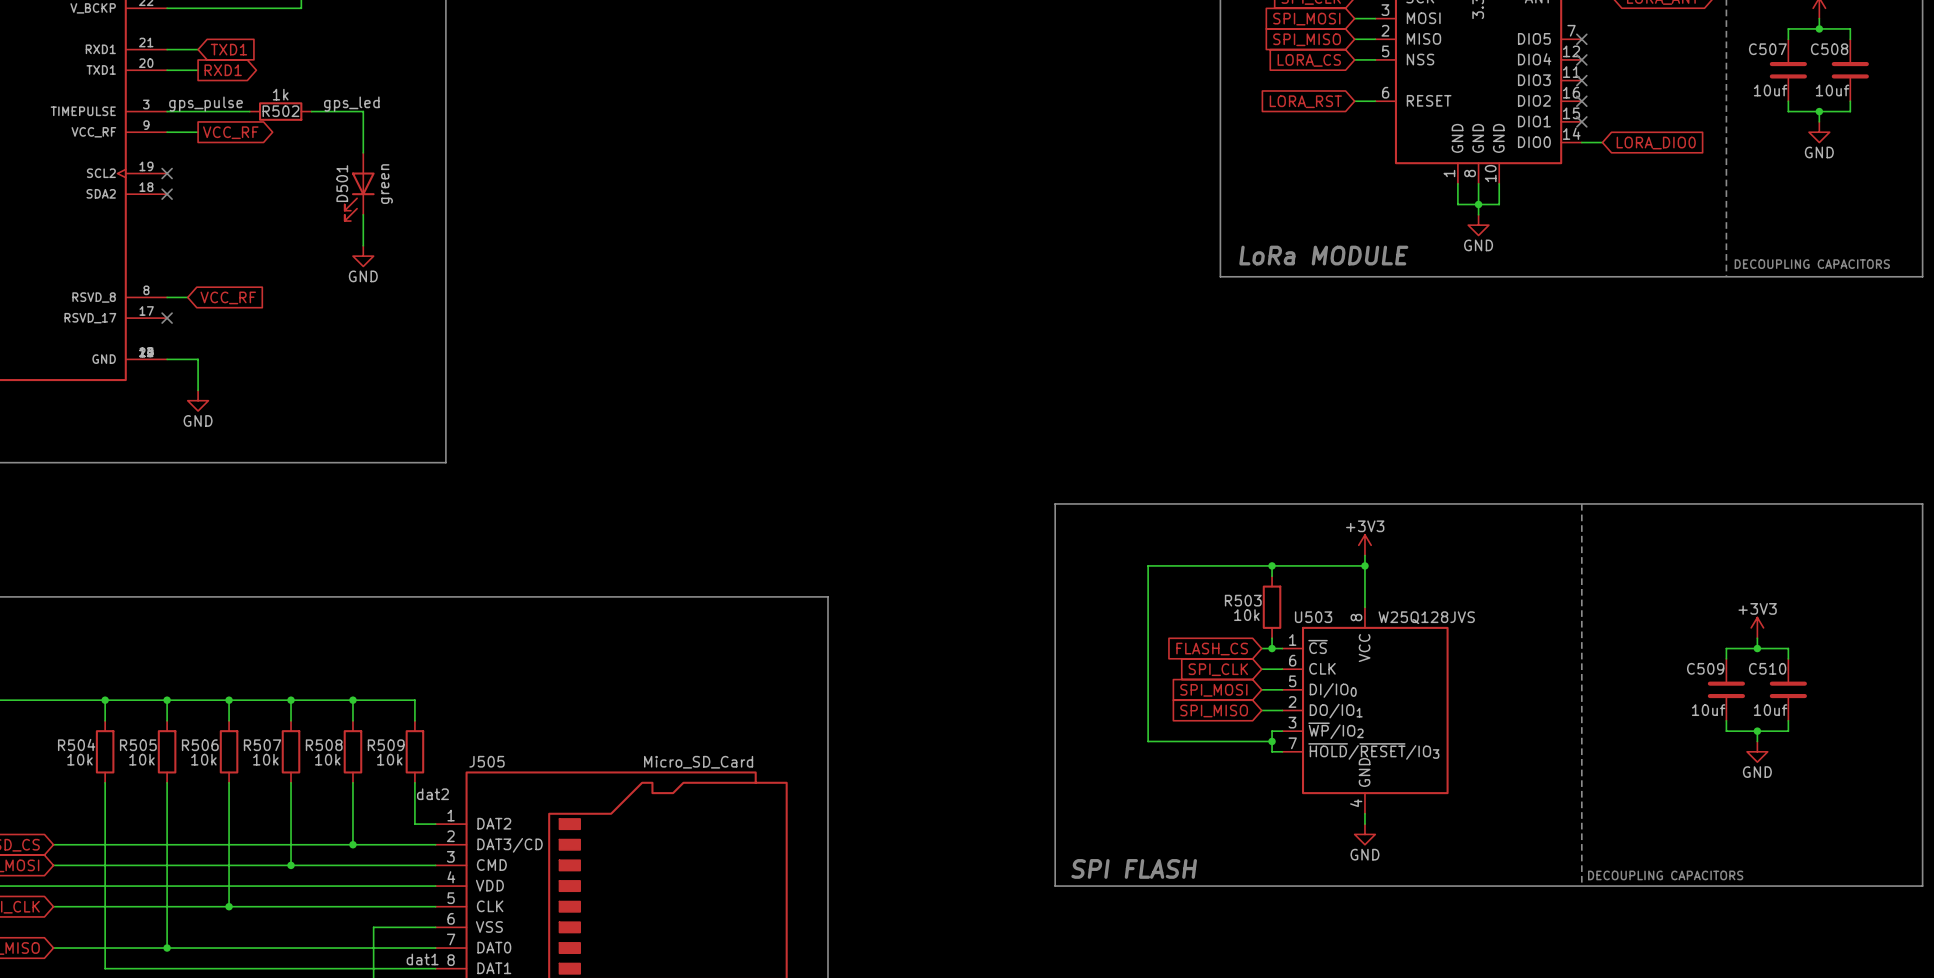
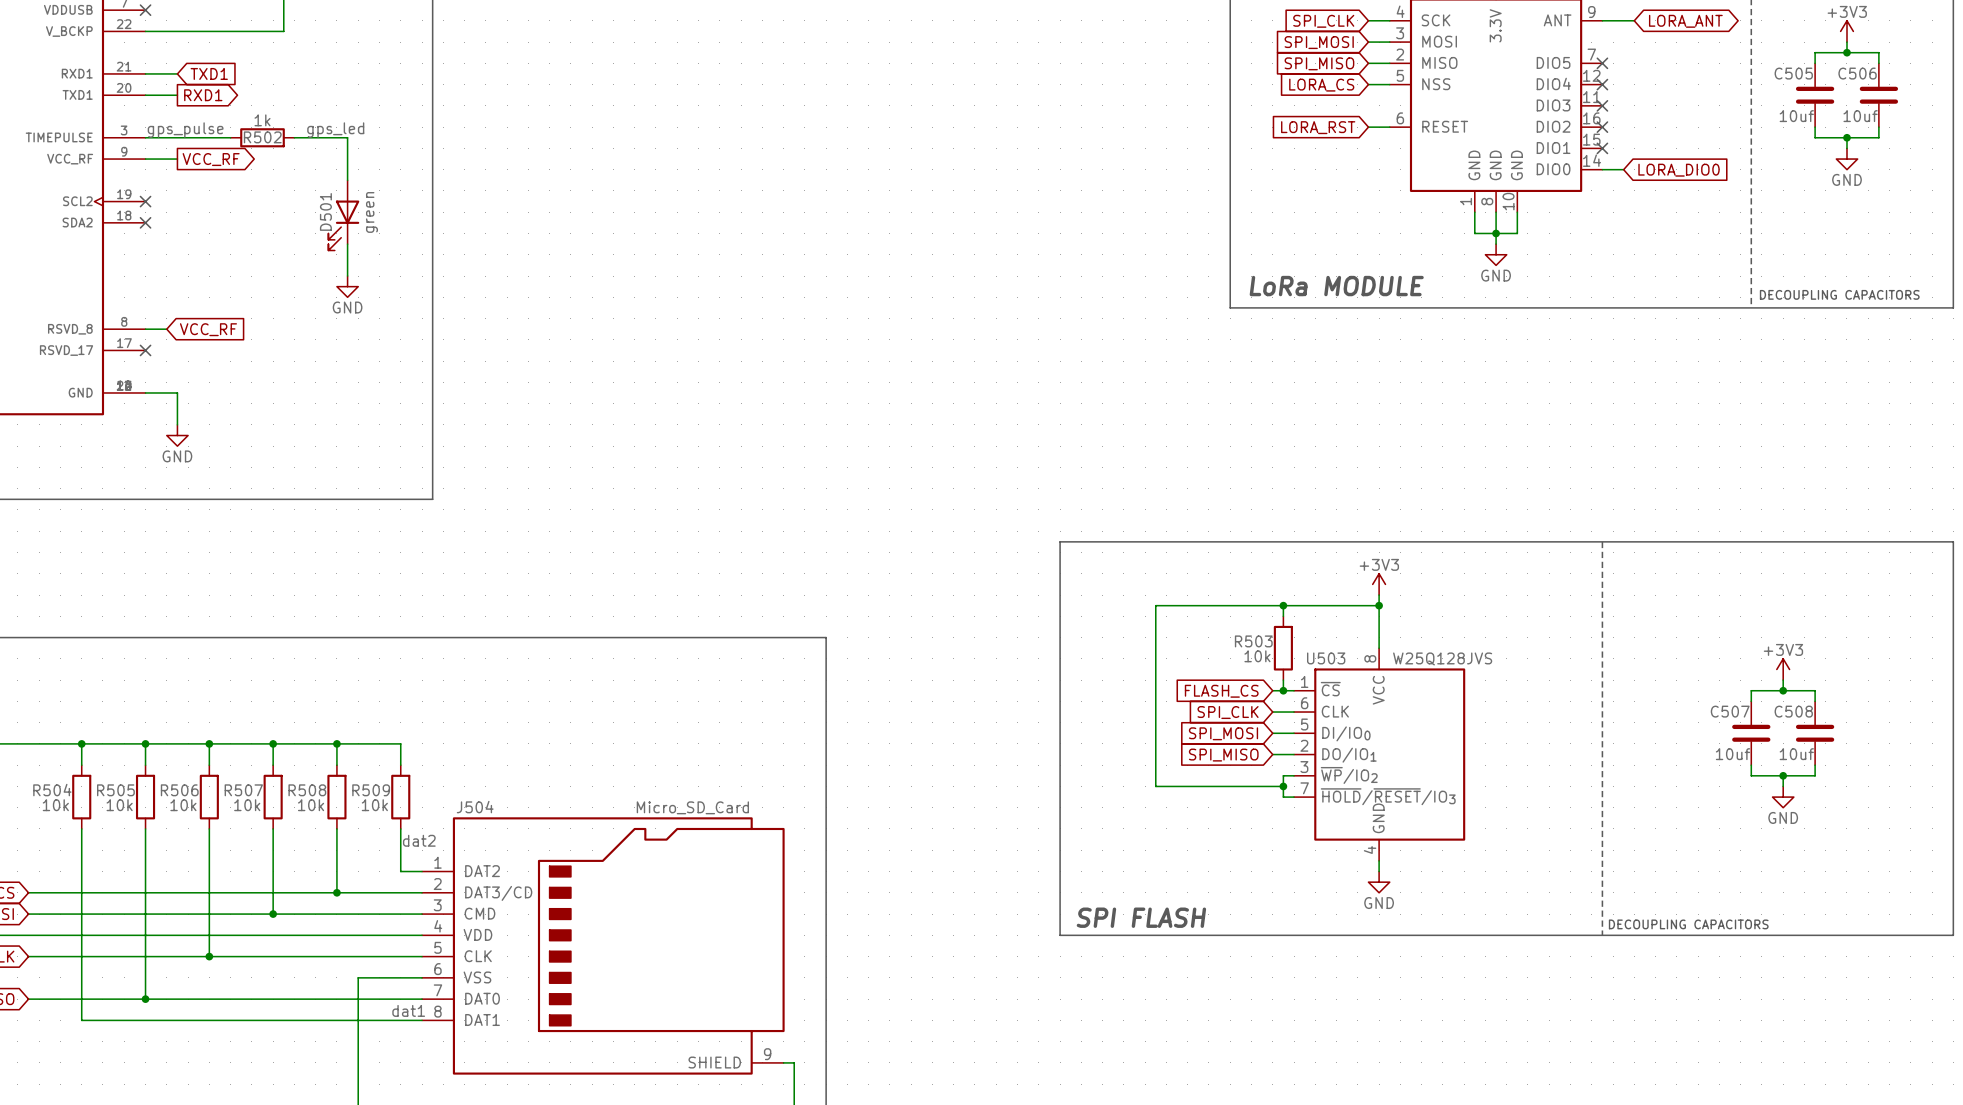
C507 name: C507 (1767, 49) -> C505 (1793, 73)
C508 name: C508 (1829, 49) -> C506 (1857, 73)
C509 name: C509 (1705, 668) -> C507 (1730, 711)
C510 name: C510 (1767, 668) -> C508 (1793, 711)
J505 name: J505 (486, 761) -> J504 (475, 807)

